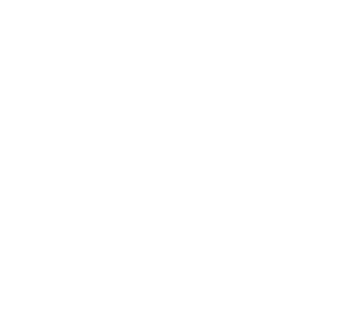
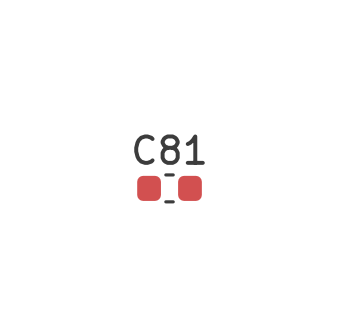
C81: none -> (169, 188)

